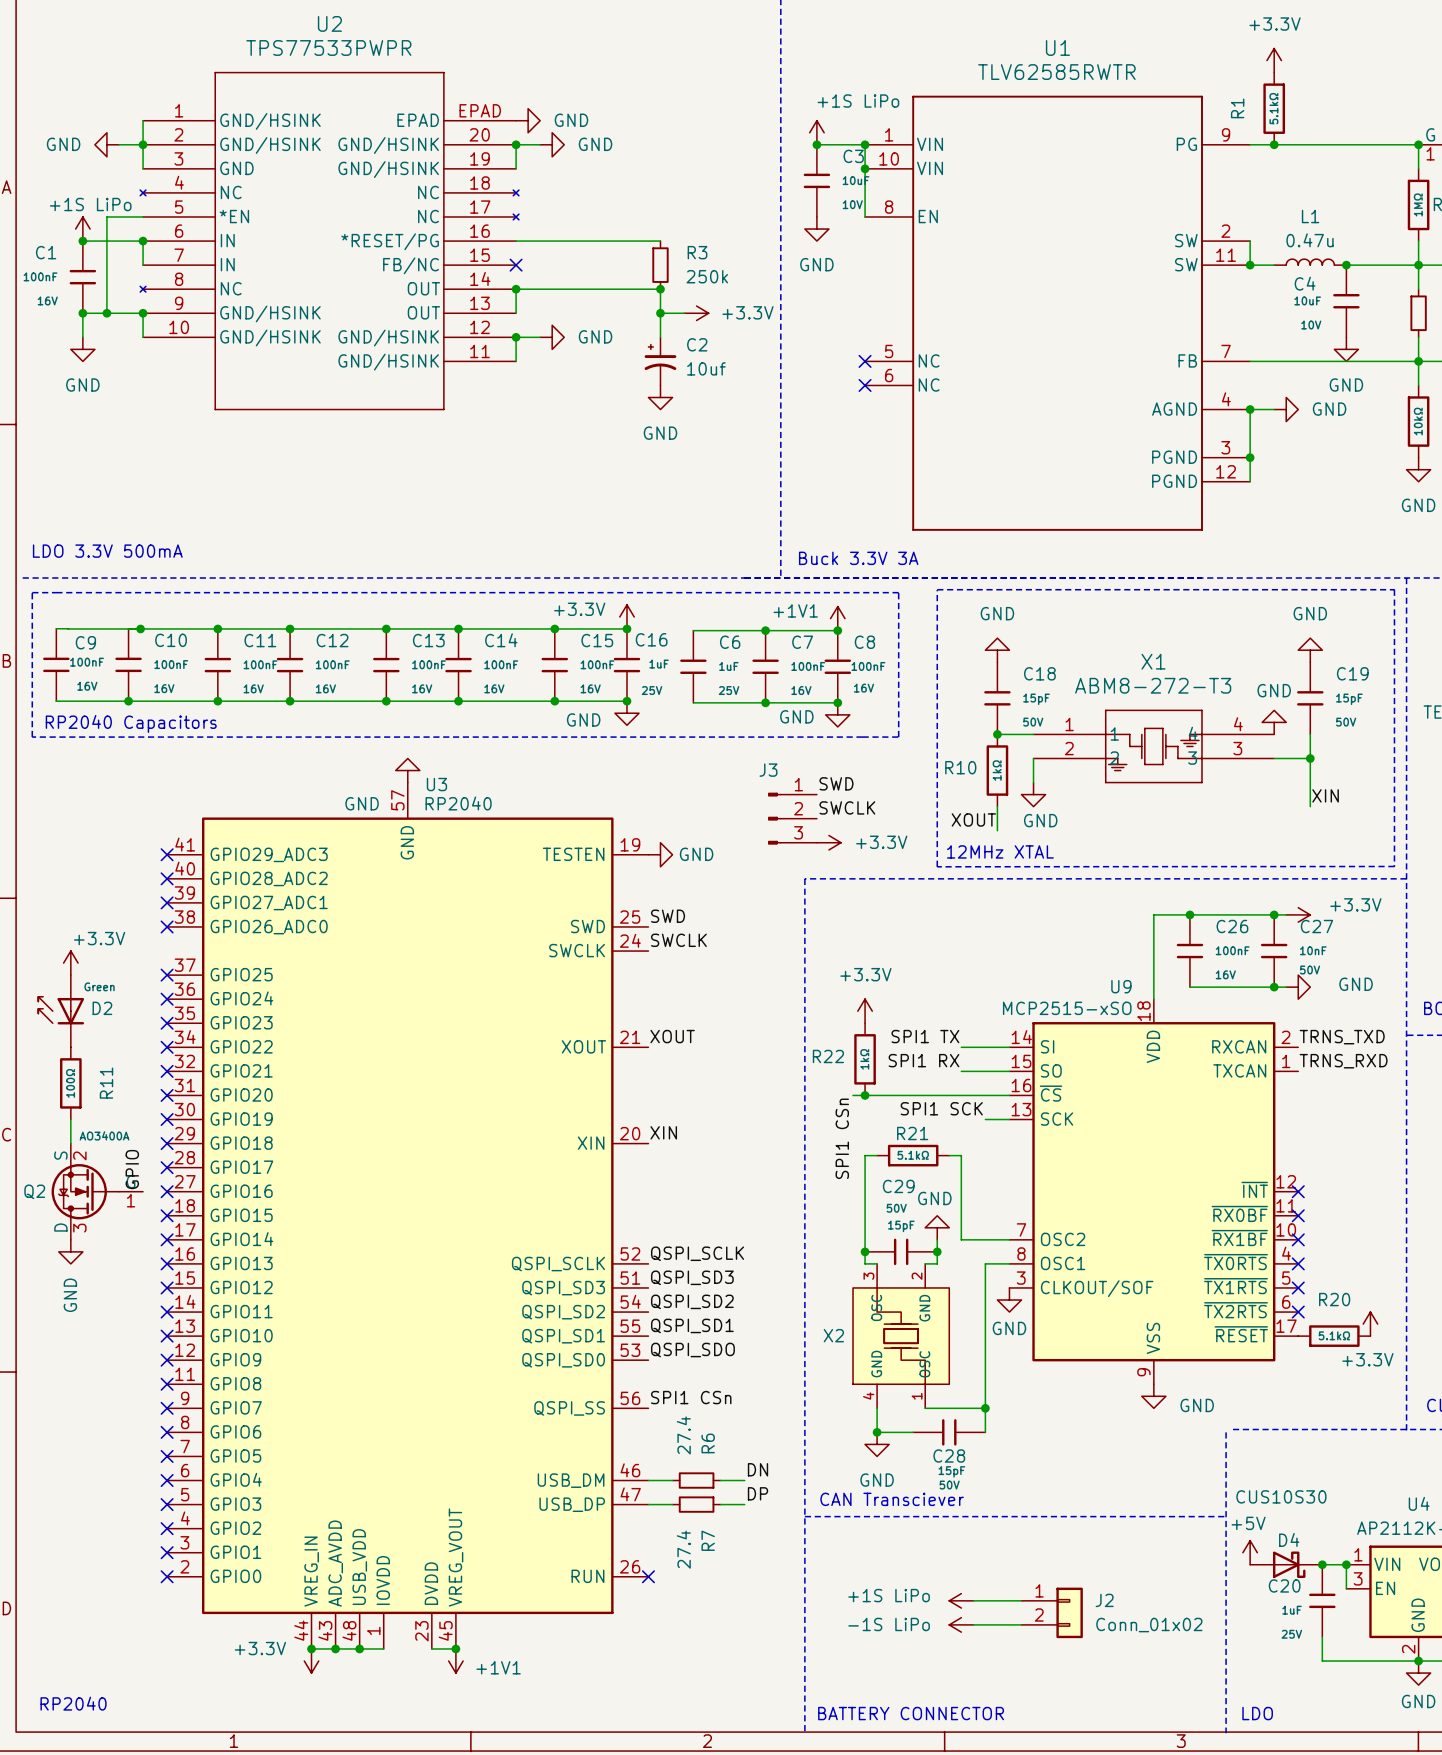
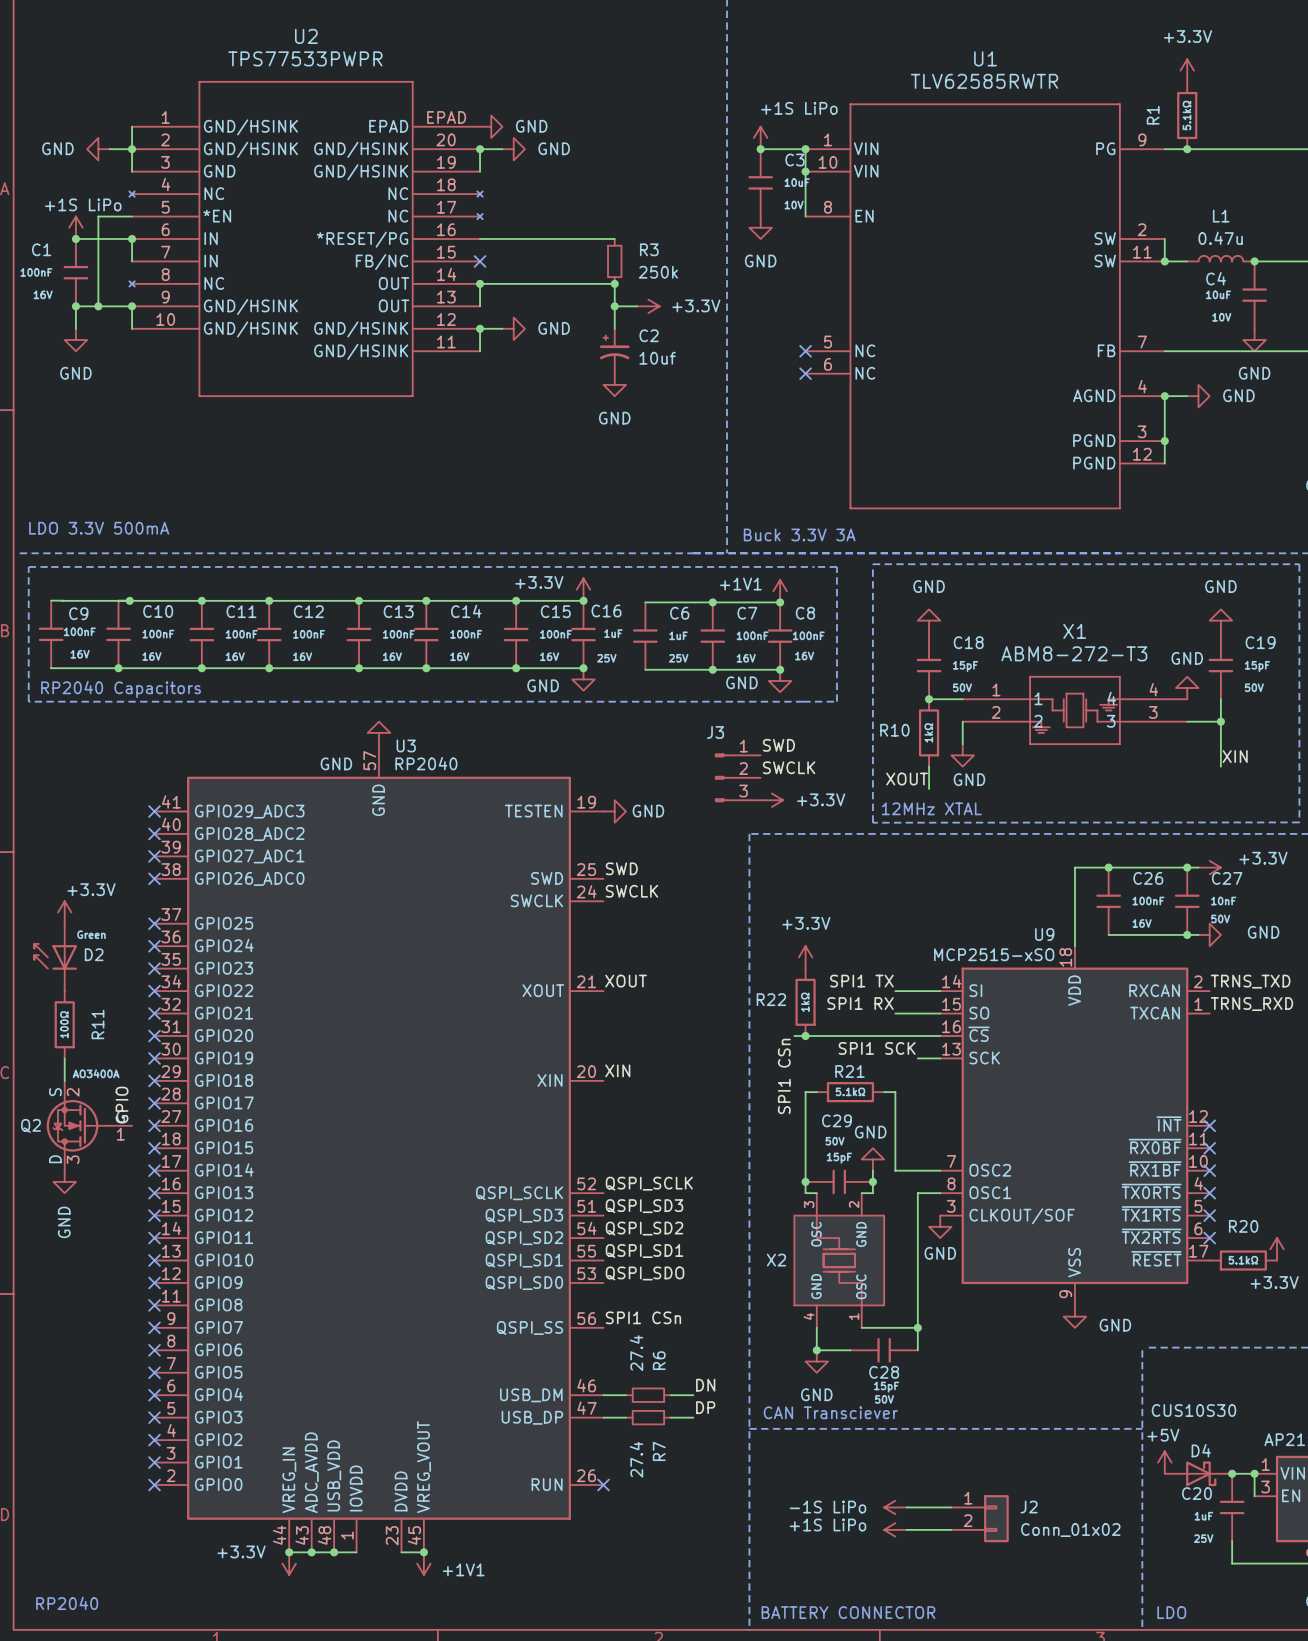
power symbol: +1S LiPo (961, 1600) -> -1S LiPo (895, 1507)
power symbol: -1S LiPo (961, 1624) -> +1S LiPo (895, 1529)

